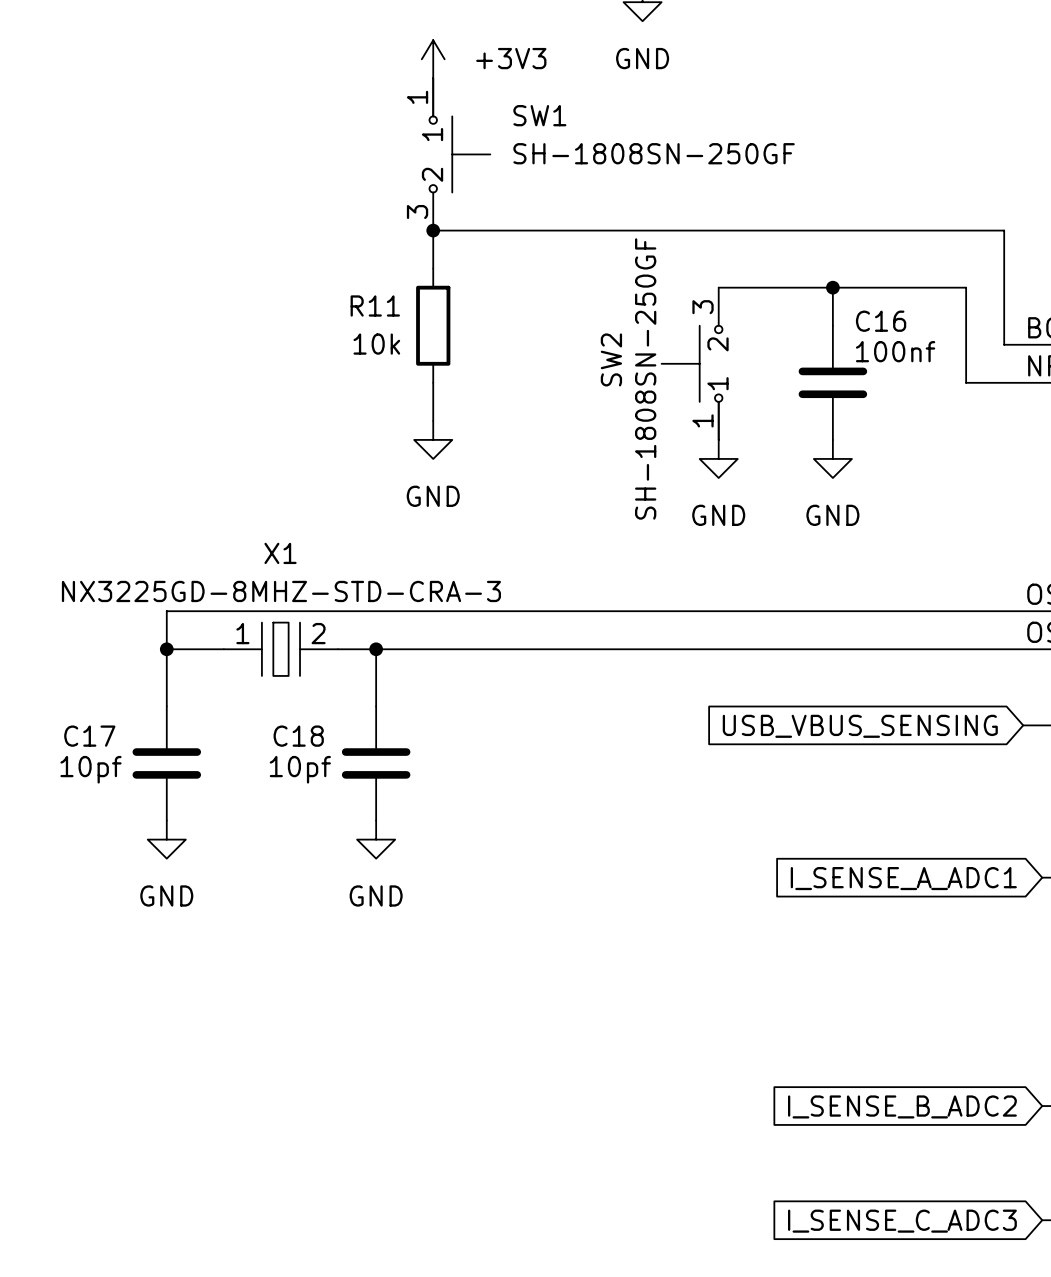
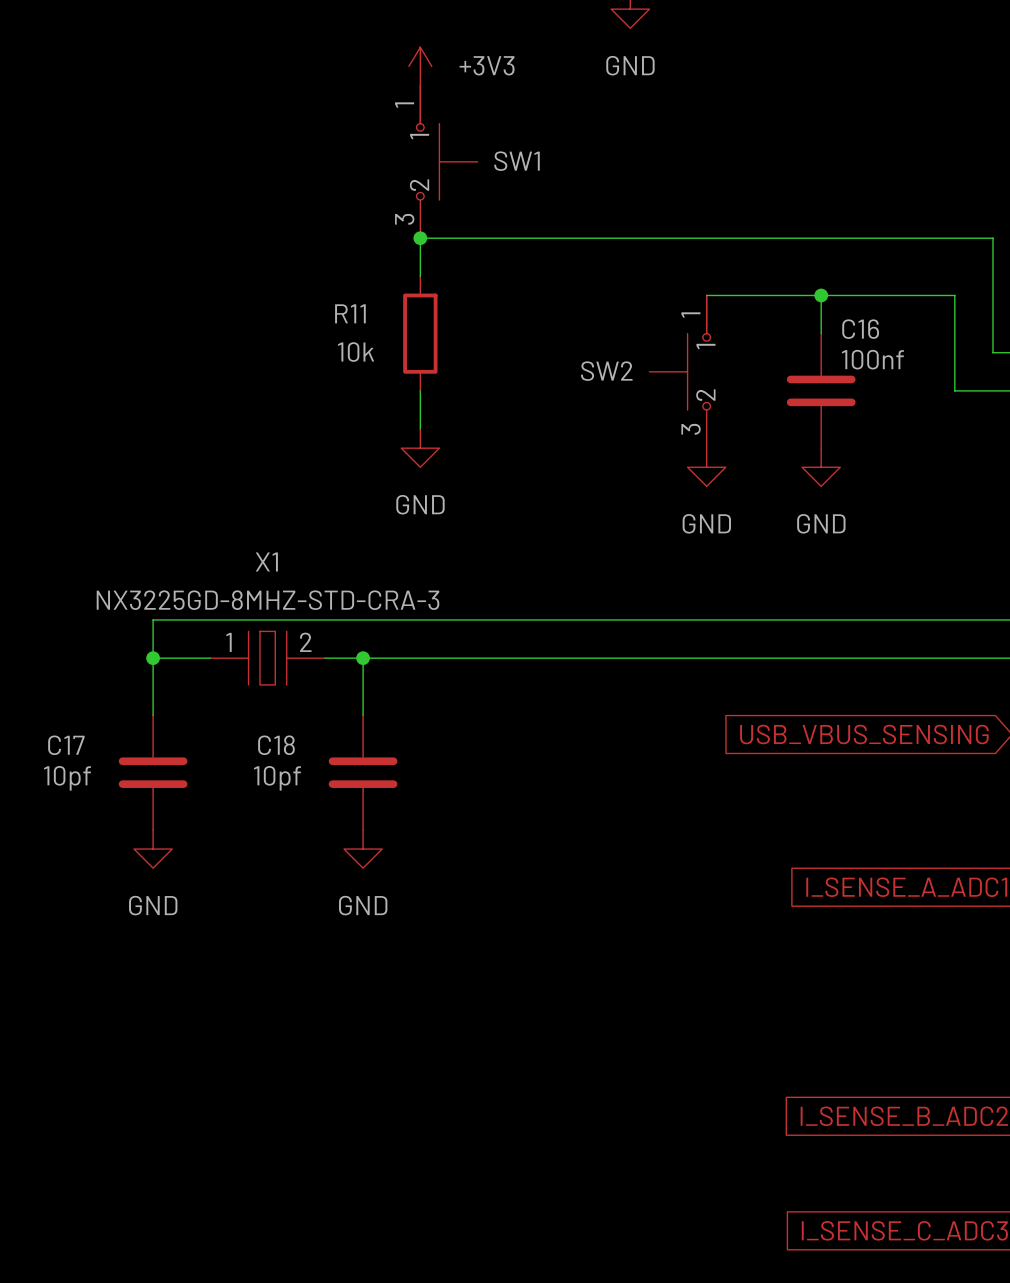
SW1 name position: SW1 (539, 115) -> SW1 (517, 161)
SW1 value: SH-1808SN-250GF (654, 153) -> none
SW2 value: SH-1808SN-250GF (645, 378) -> none
SW2 flip: as is (692, 382) -> up-down (679, 352)

